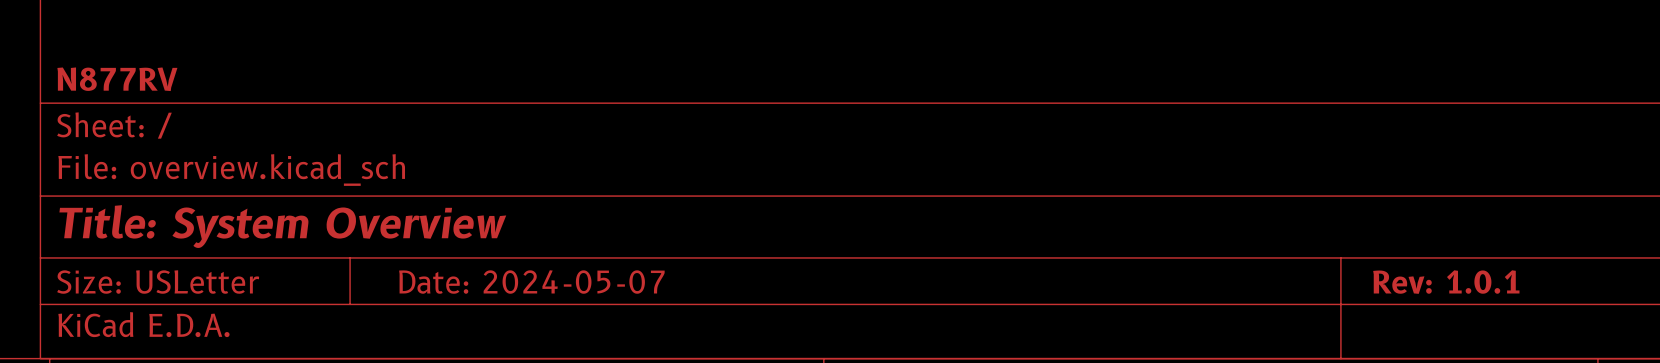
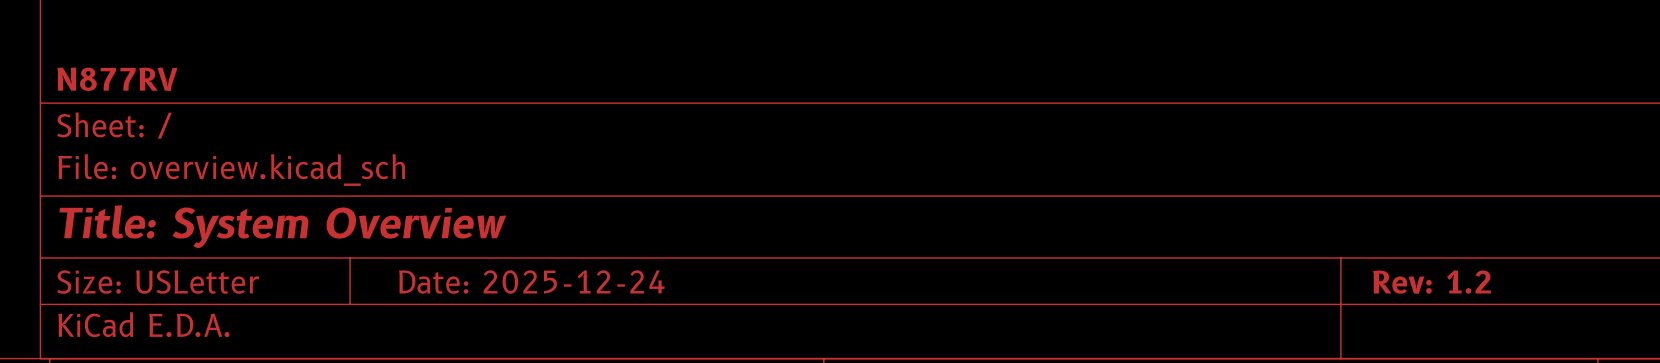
title block: Date: 2024-05-07 (531, 282) -> Date: 2025-12-24 (531, 282)
title block: Rev: 1.0.1 (1446, 282) -> Rev: 1.2 (1432, 282)

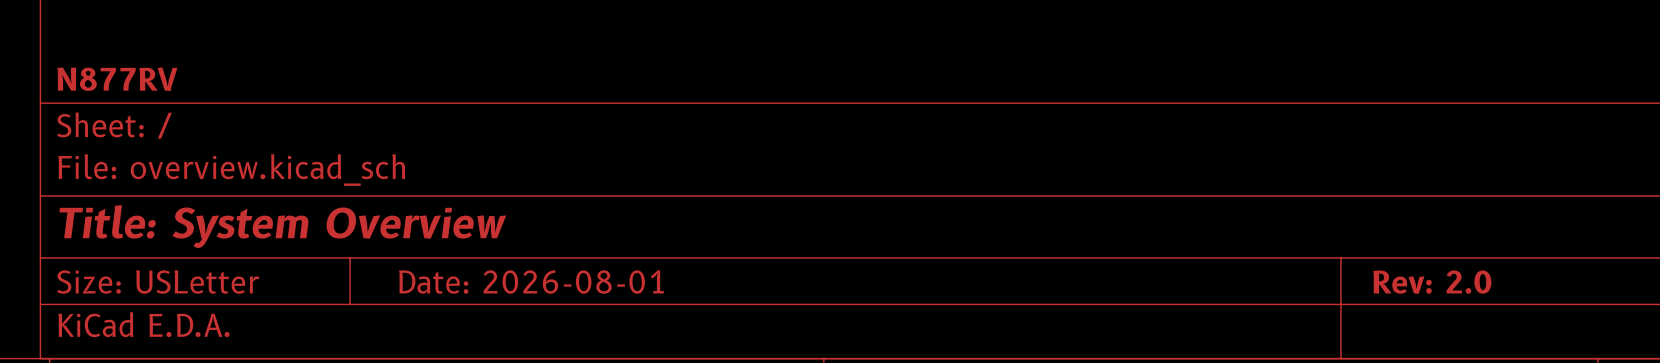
title block: Date: 2025-12-24 (531, 282) -> Date: 2026-08-01 (531, 282)
title block: Rev: 1.2 (1432, 282) -> Rev: 2.0 (1432, 282)

